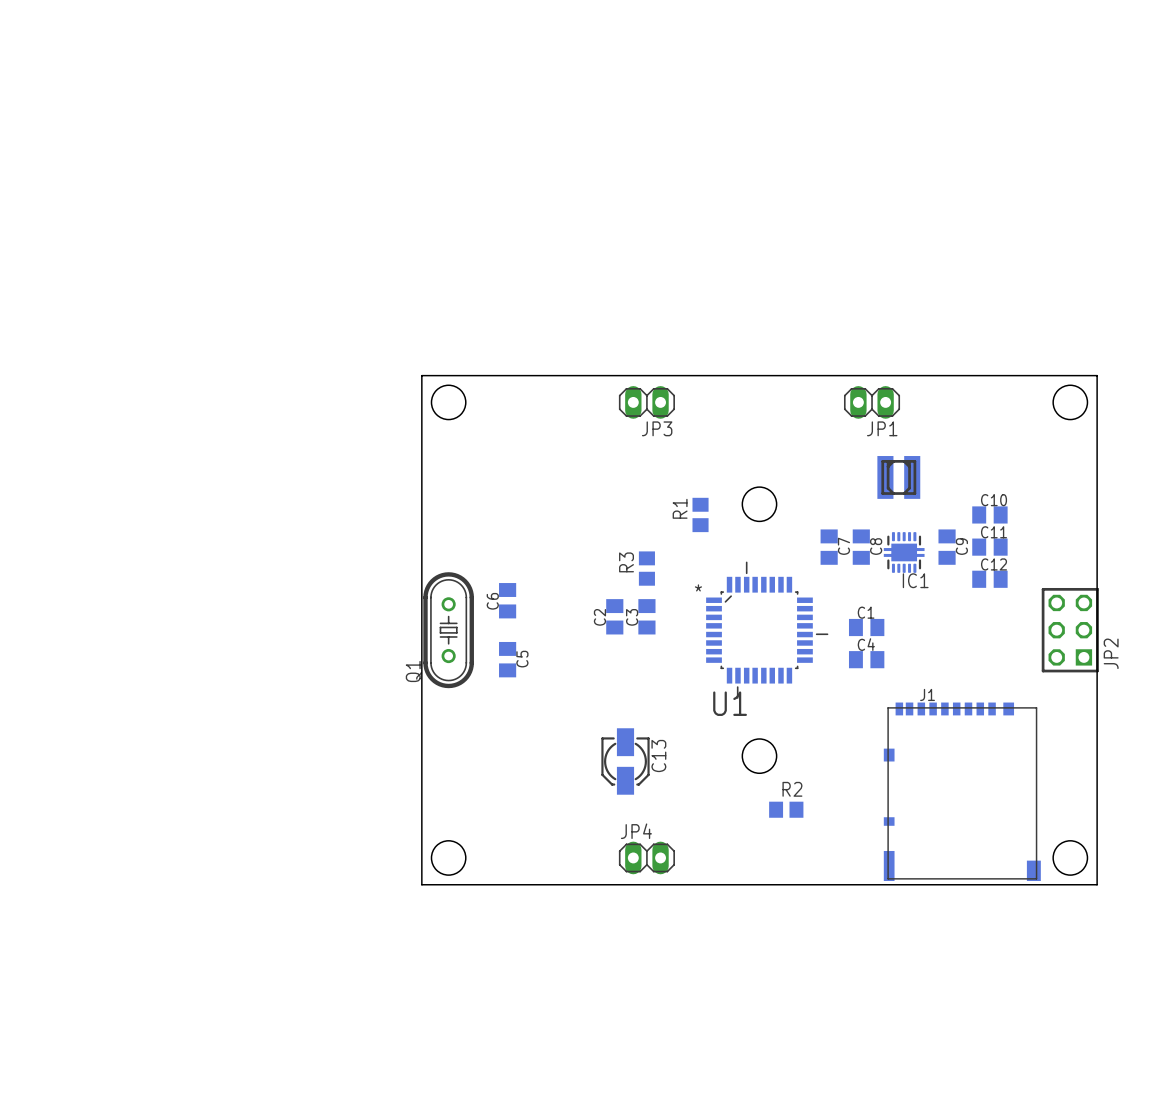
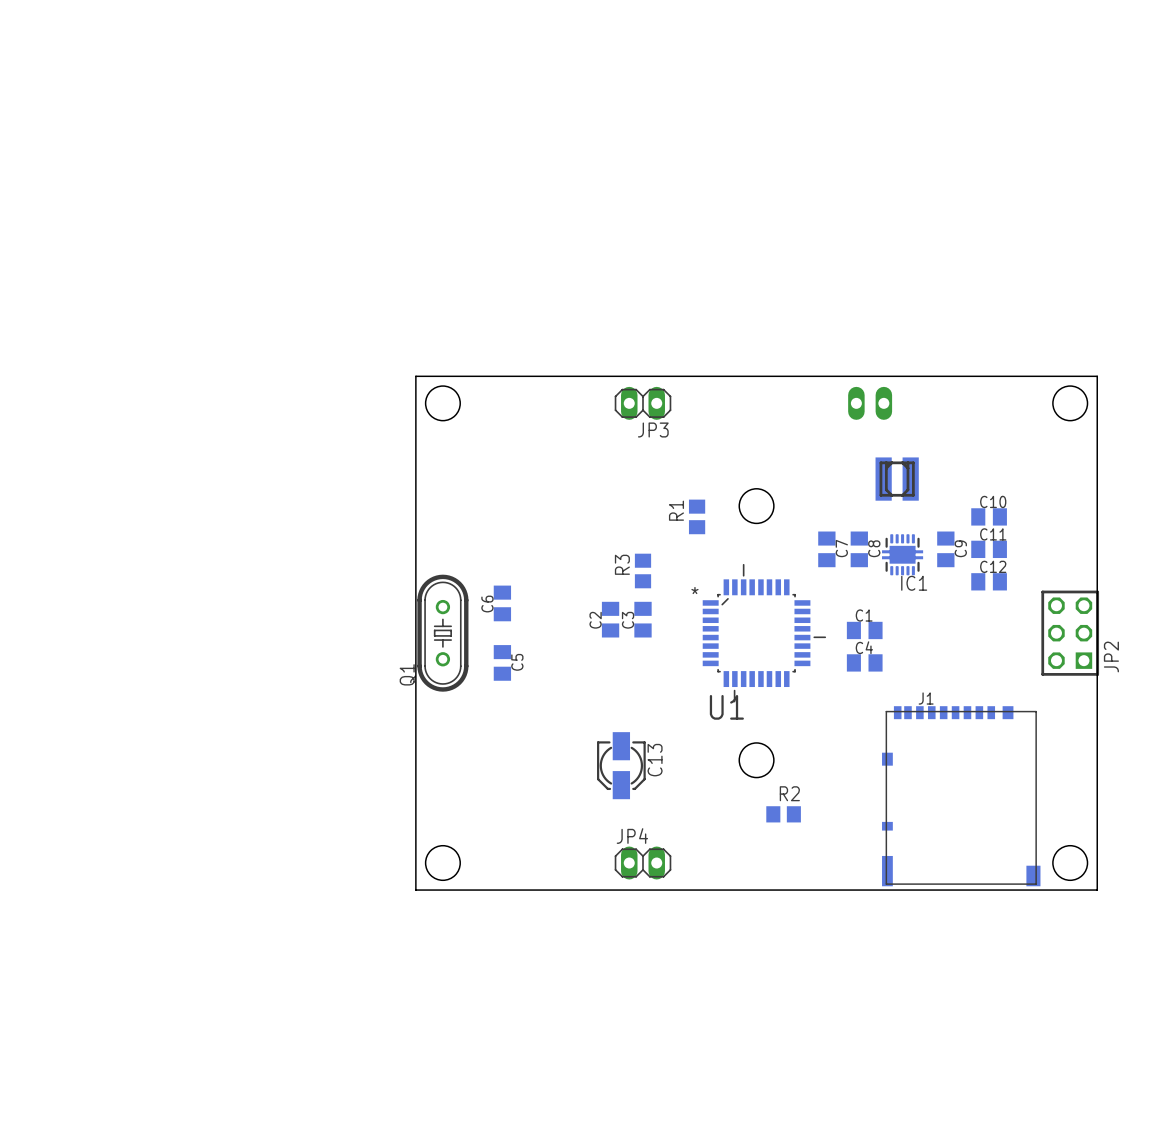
JP1 side: bottom (872, 402) -> top (870, 403)

